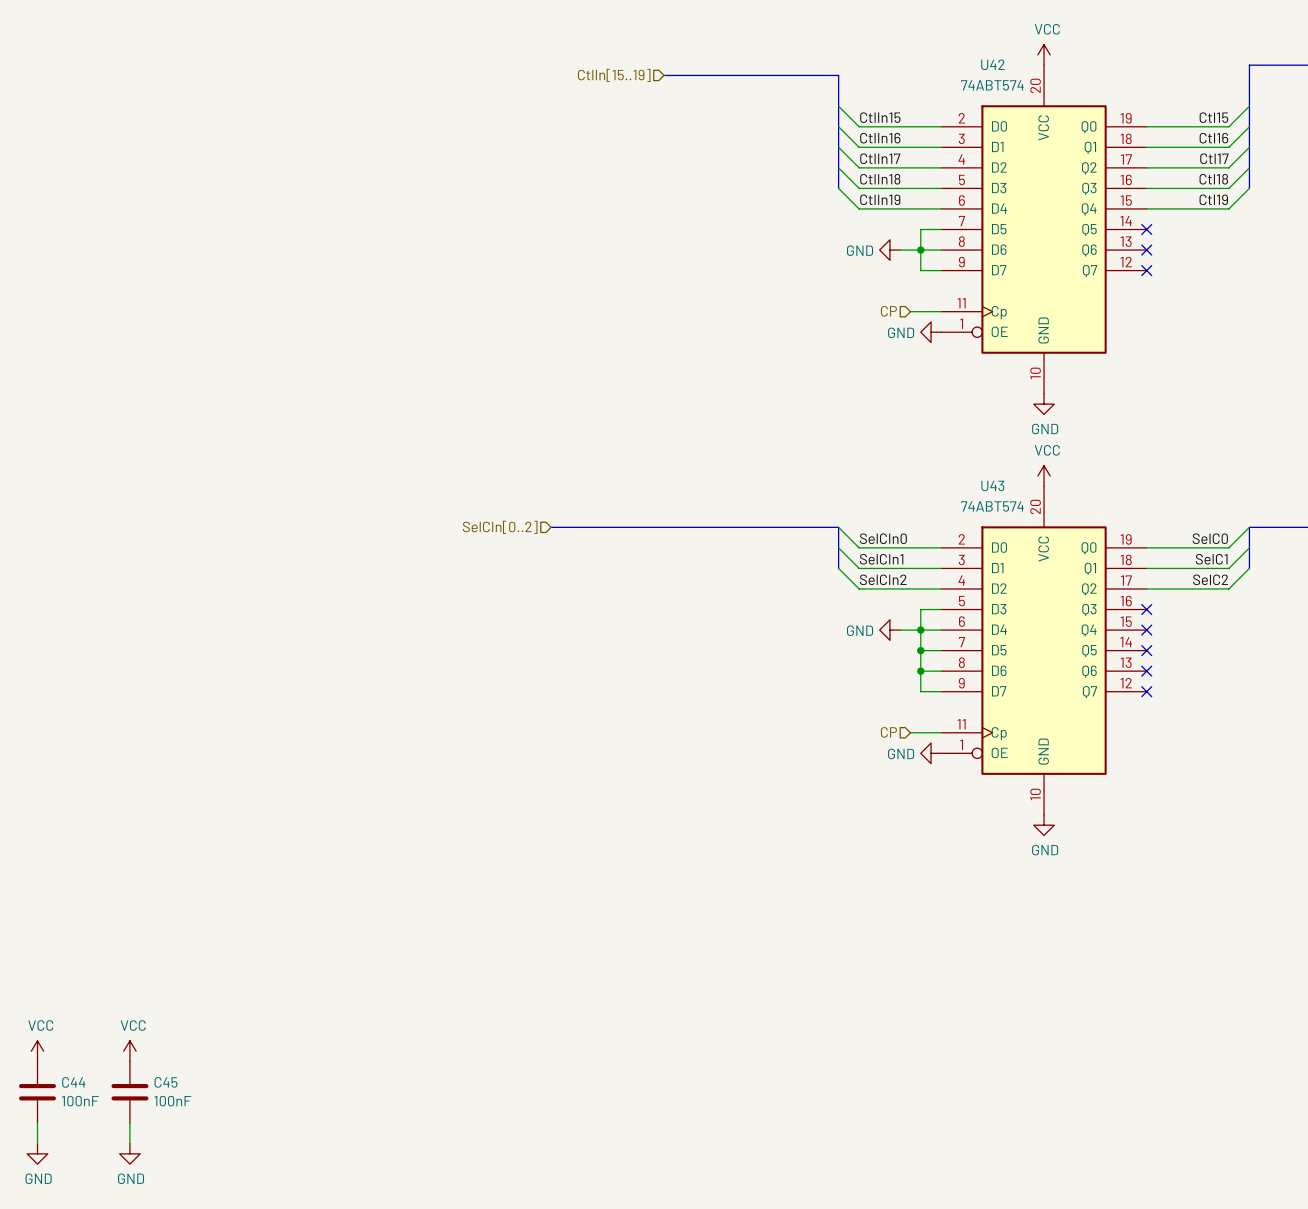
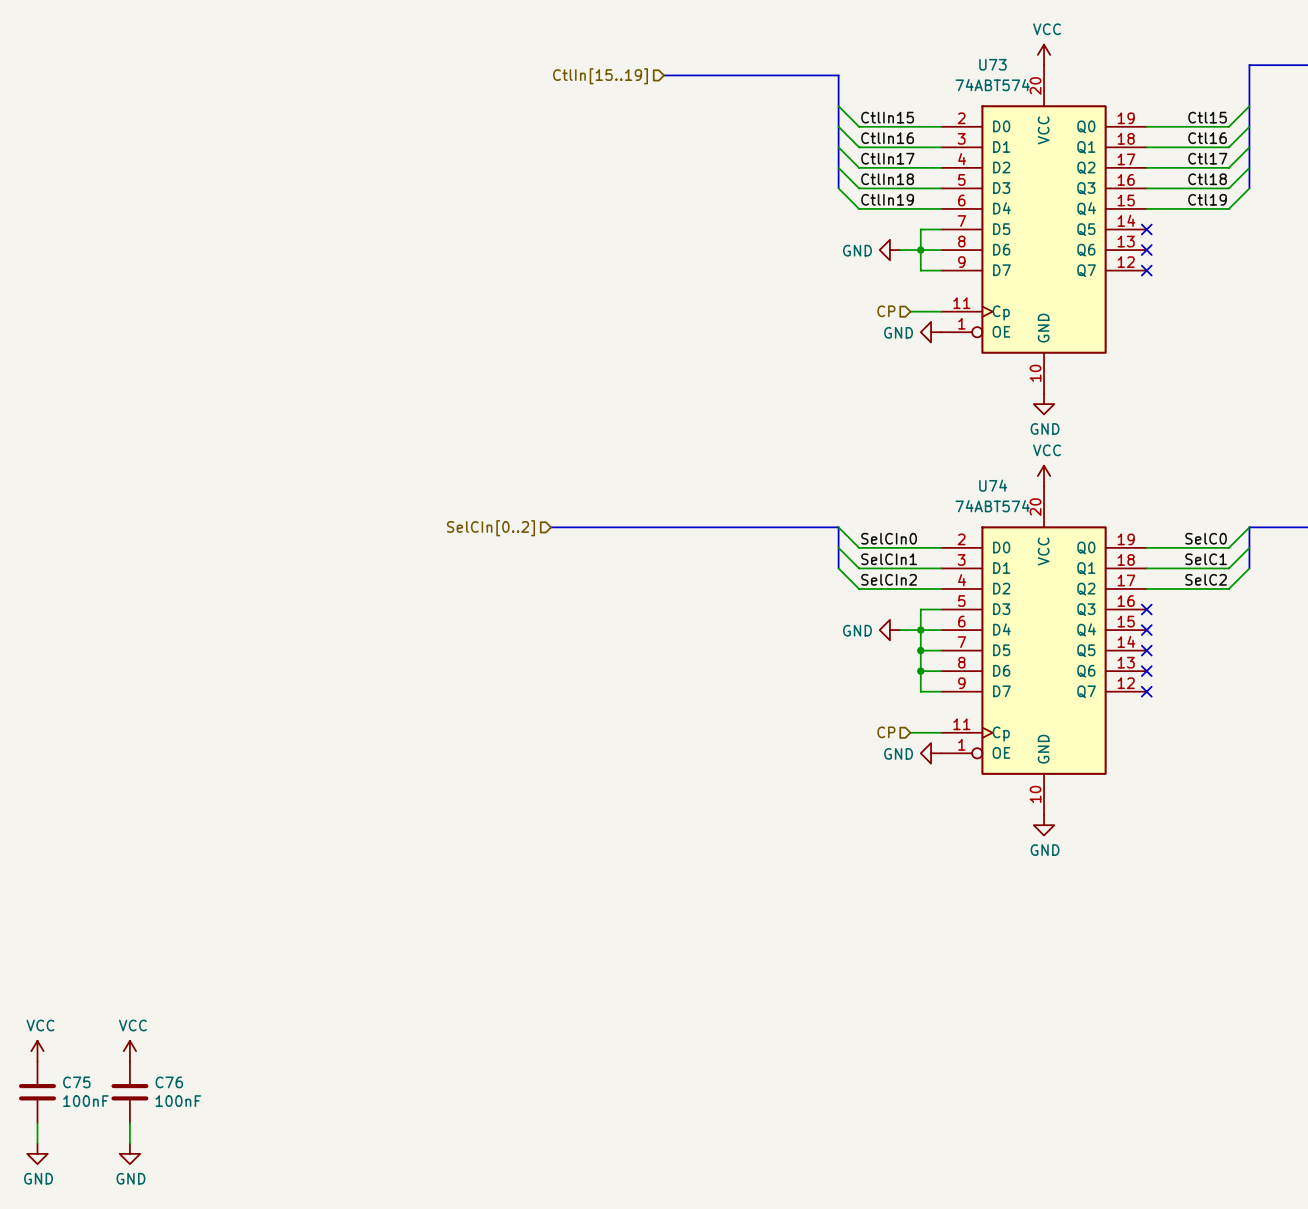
U42 name: U42 (992, 64) -> U73 (992, 64)
U43 name: U43 (992, 485) -> U74 (993, 485)
C44 name: C44 (73, 1082) -> C75 (76, 1082)
C45 name: C45 (165, 1082) -> C76 (169, 1082)

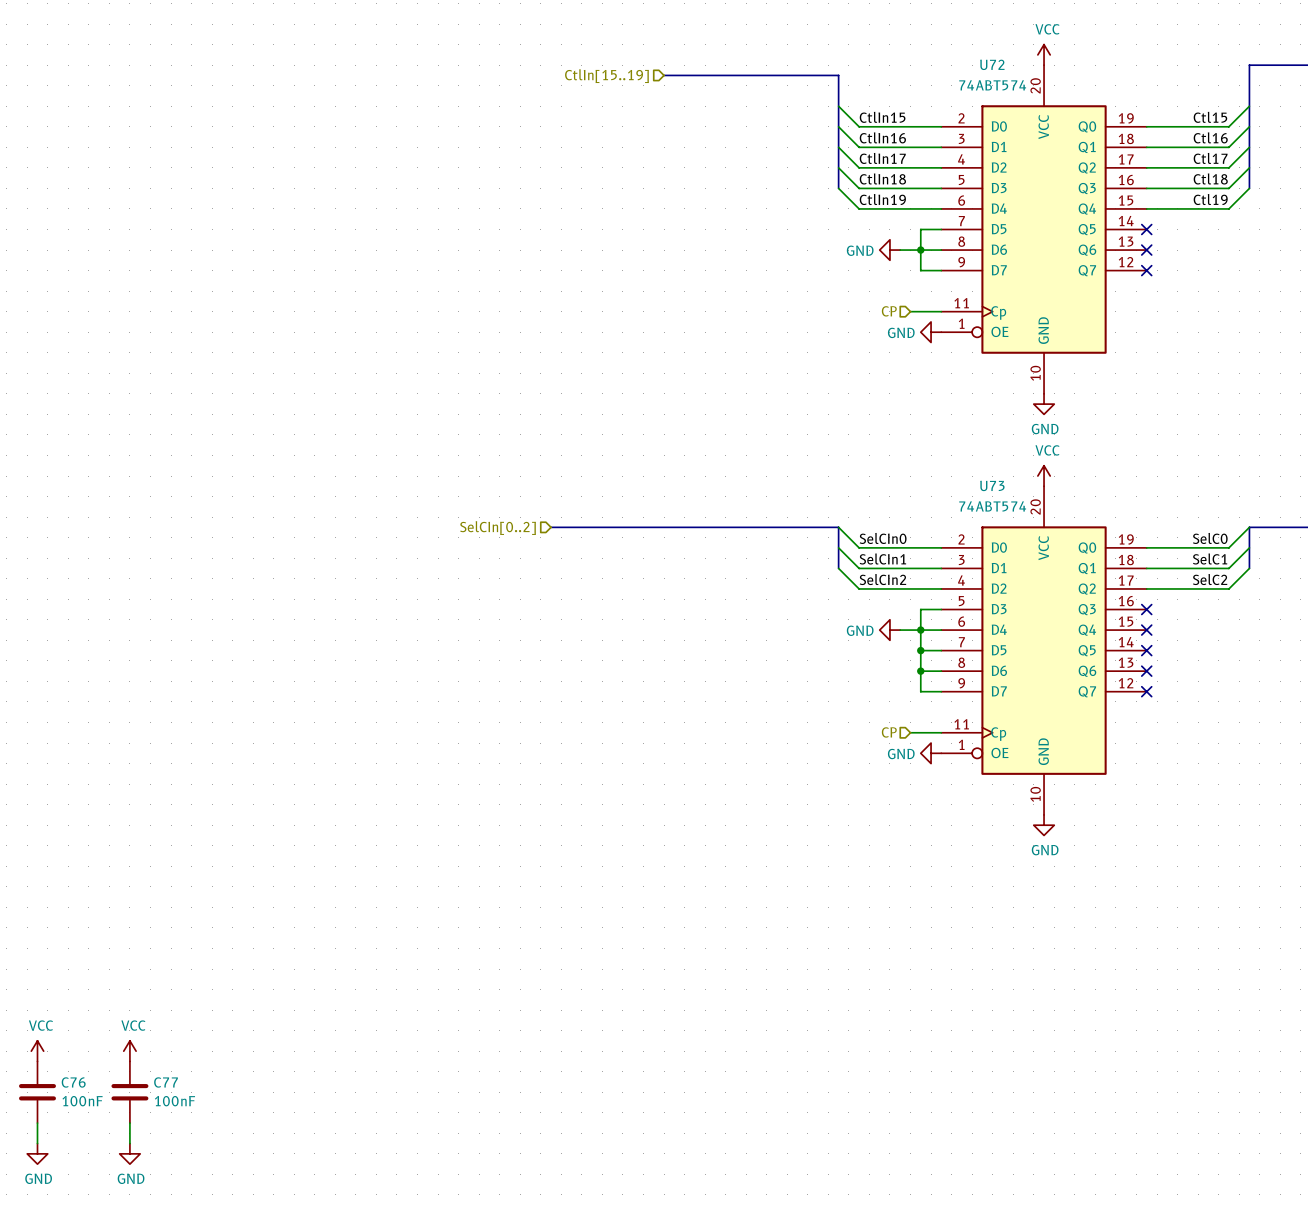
U73 name: U73 (992, 64) -> U72 (992, 64)
U74 name: U74 (993, 485) -> U73 (992, 485)
C75 name: C75 (76, 1082) -> C76 (73, 1082)
C76 name: C76 (169, 1082) -> C77 (166, 1082)

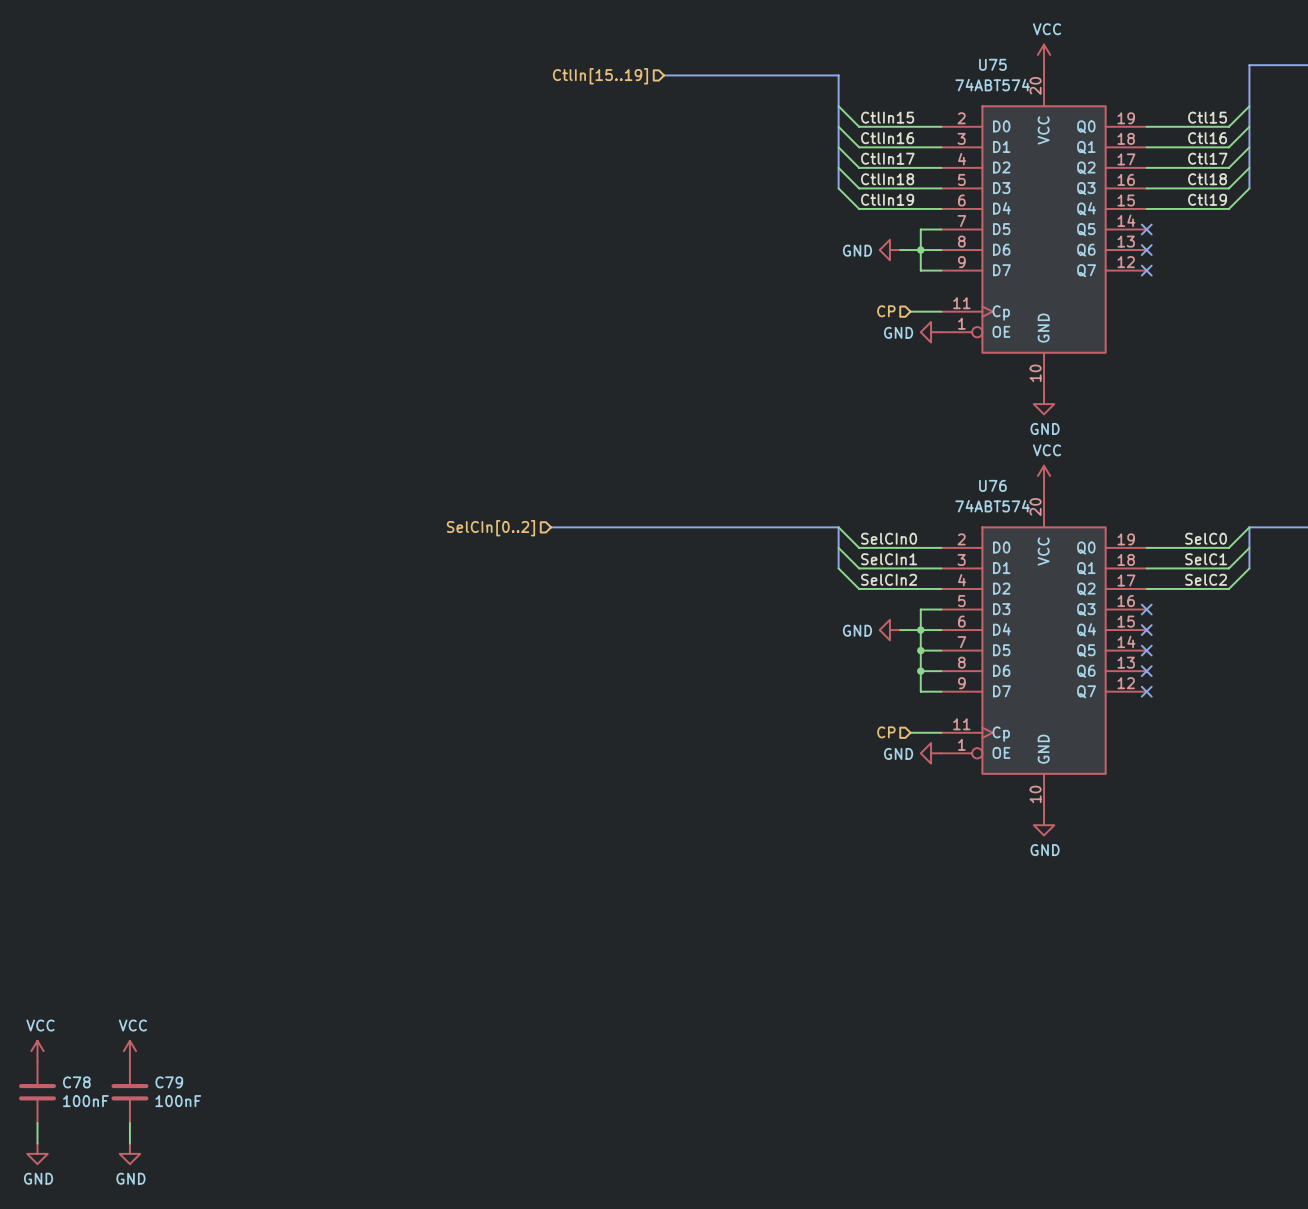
U72 name: U72 (992, 64) -> U75 (992, 64)
U73 name: U73 (992, 485) -> U76 (992, 485)
C76 name: C76 (73, 1082) -> C78 (76, 1082)
C77 name: C77 (166, 1082) -> C79 (169, 1082)

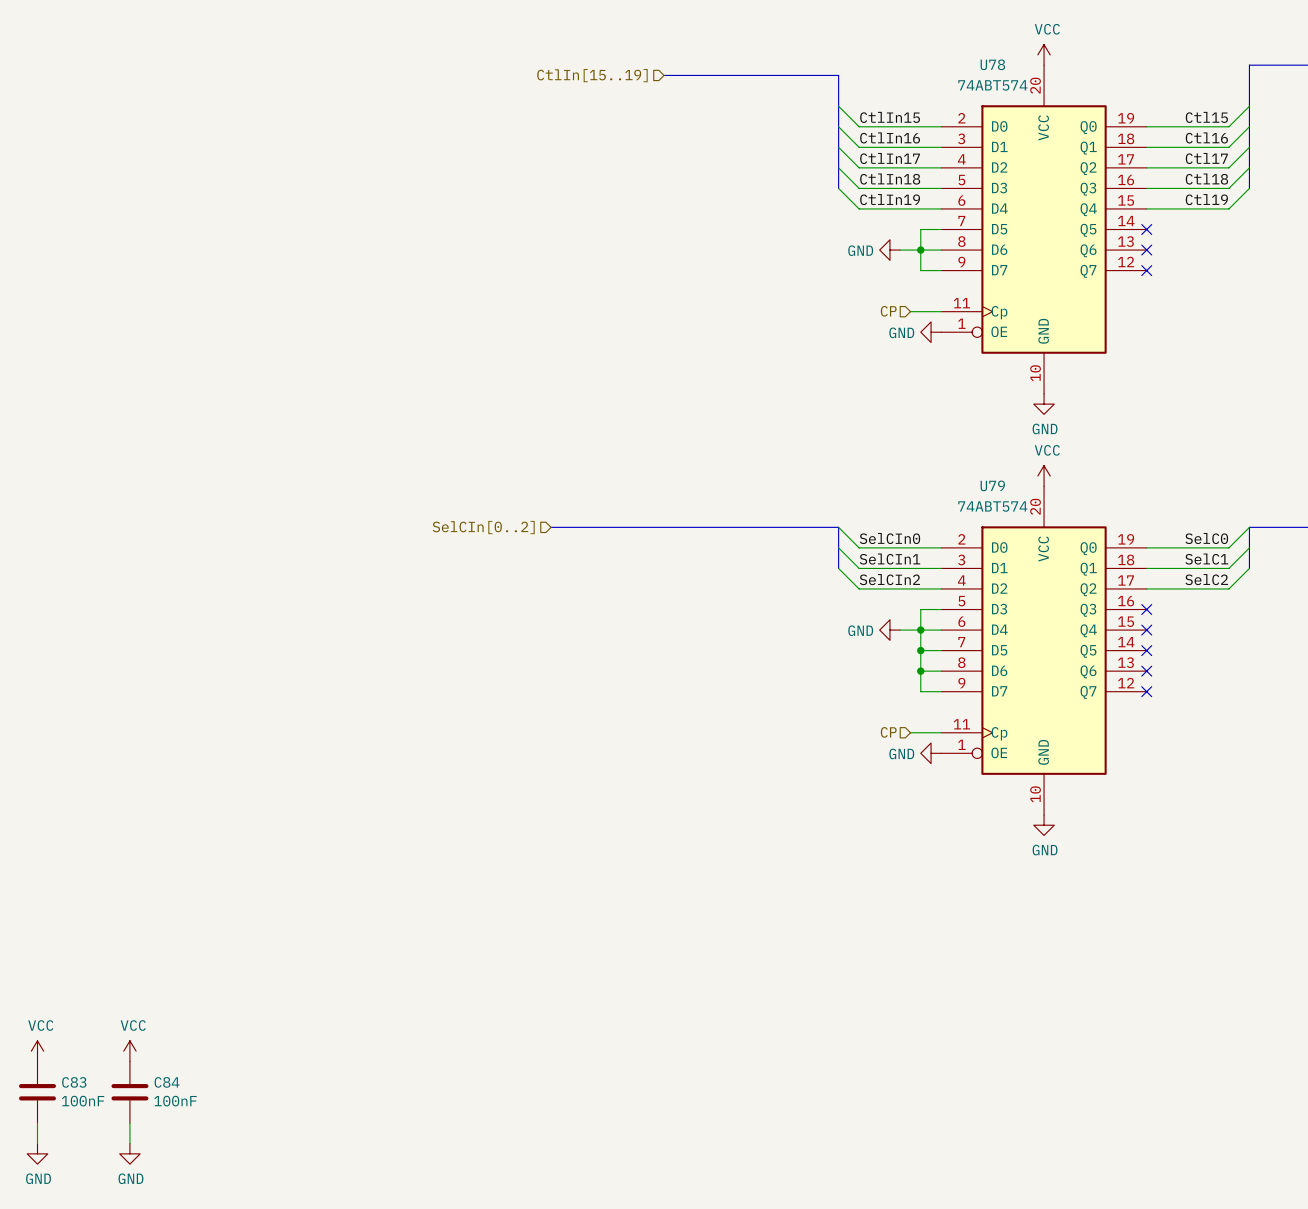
U75 name: U75 (992, 64) -> U78 (992, 64)
U76 name: U76 (992, 485) -> U79 (992, 485)
C78 name: C78 (76, 1082) -> C83 (74, 1082)
C79 name: C79 (169, 1082) -> C84 (167, 1082)

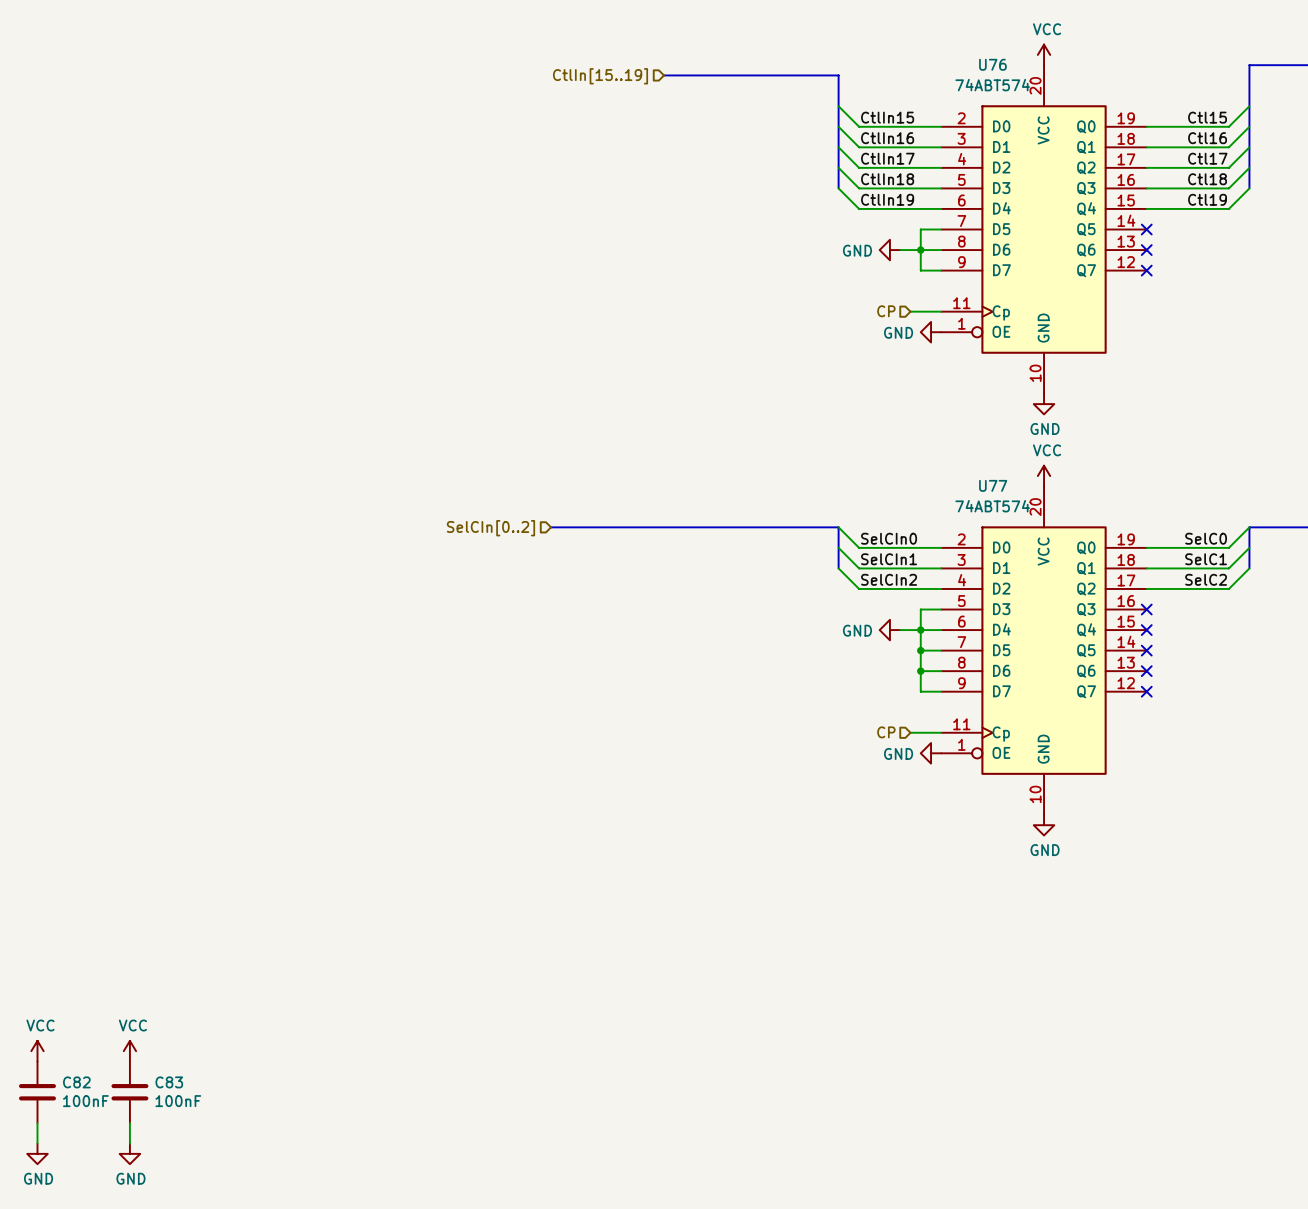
U78 name: U78 (992, 64) -> U76 (992, 64)
U79 name: U79 (992, 485) -> U77 (993, 485)
C83 name: C83 (74, 1082) -> C82 (76, 1082)
C84 name: C84 (167, 1082) -> C83 (169, 1082)

